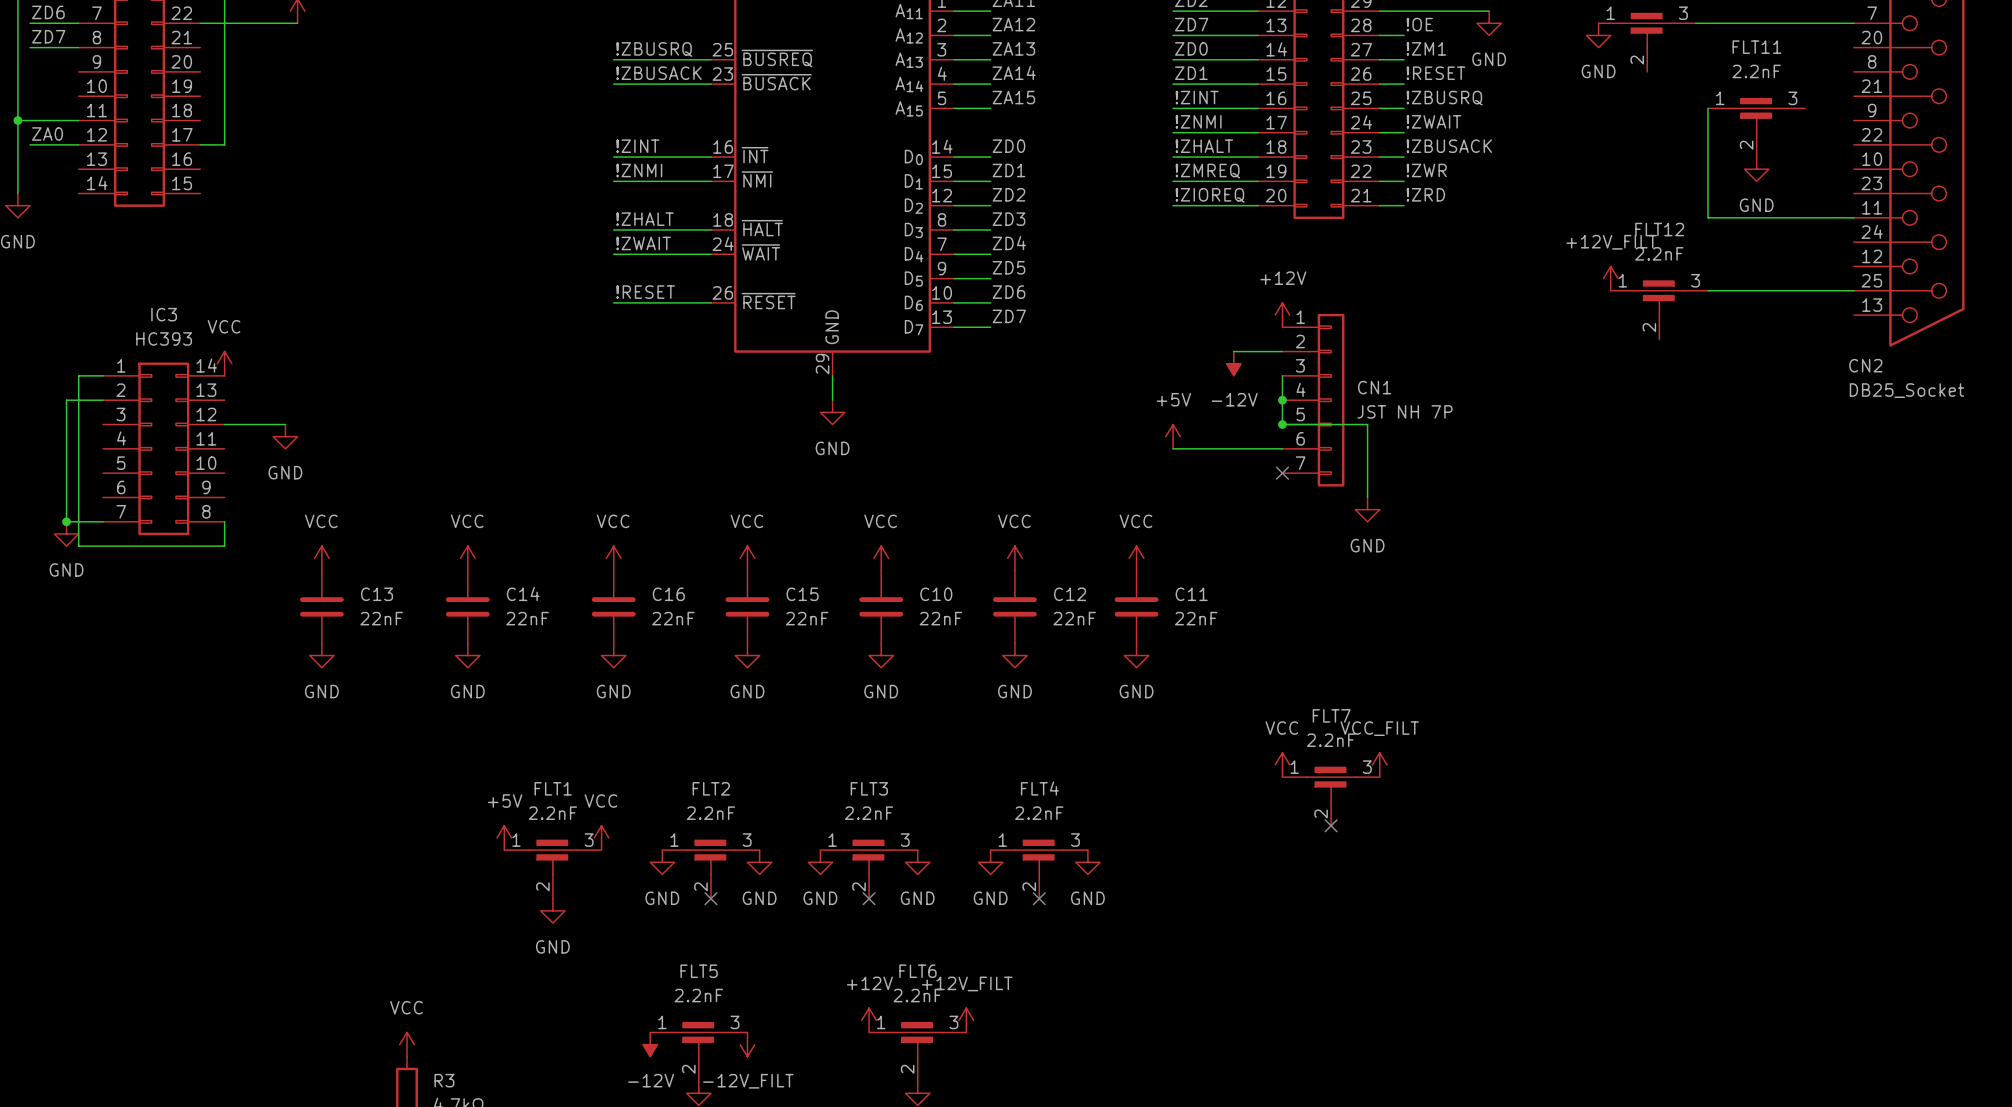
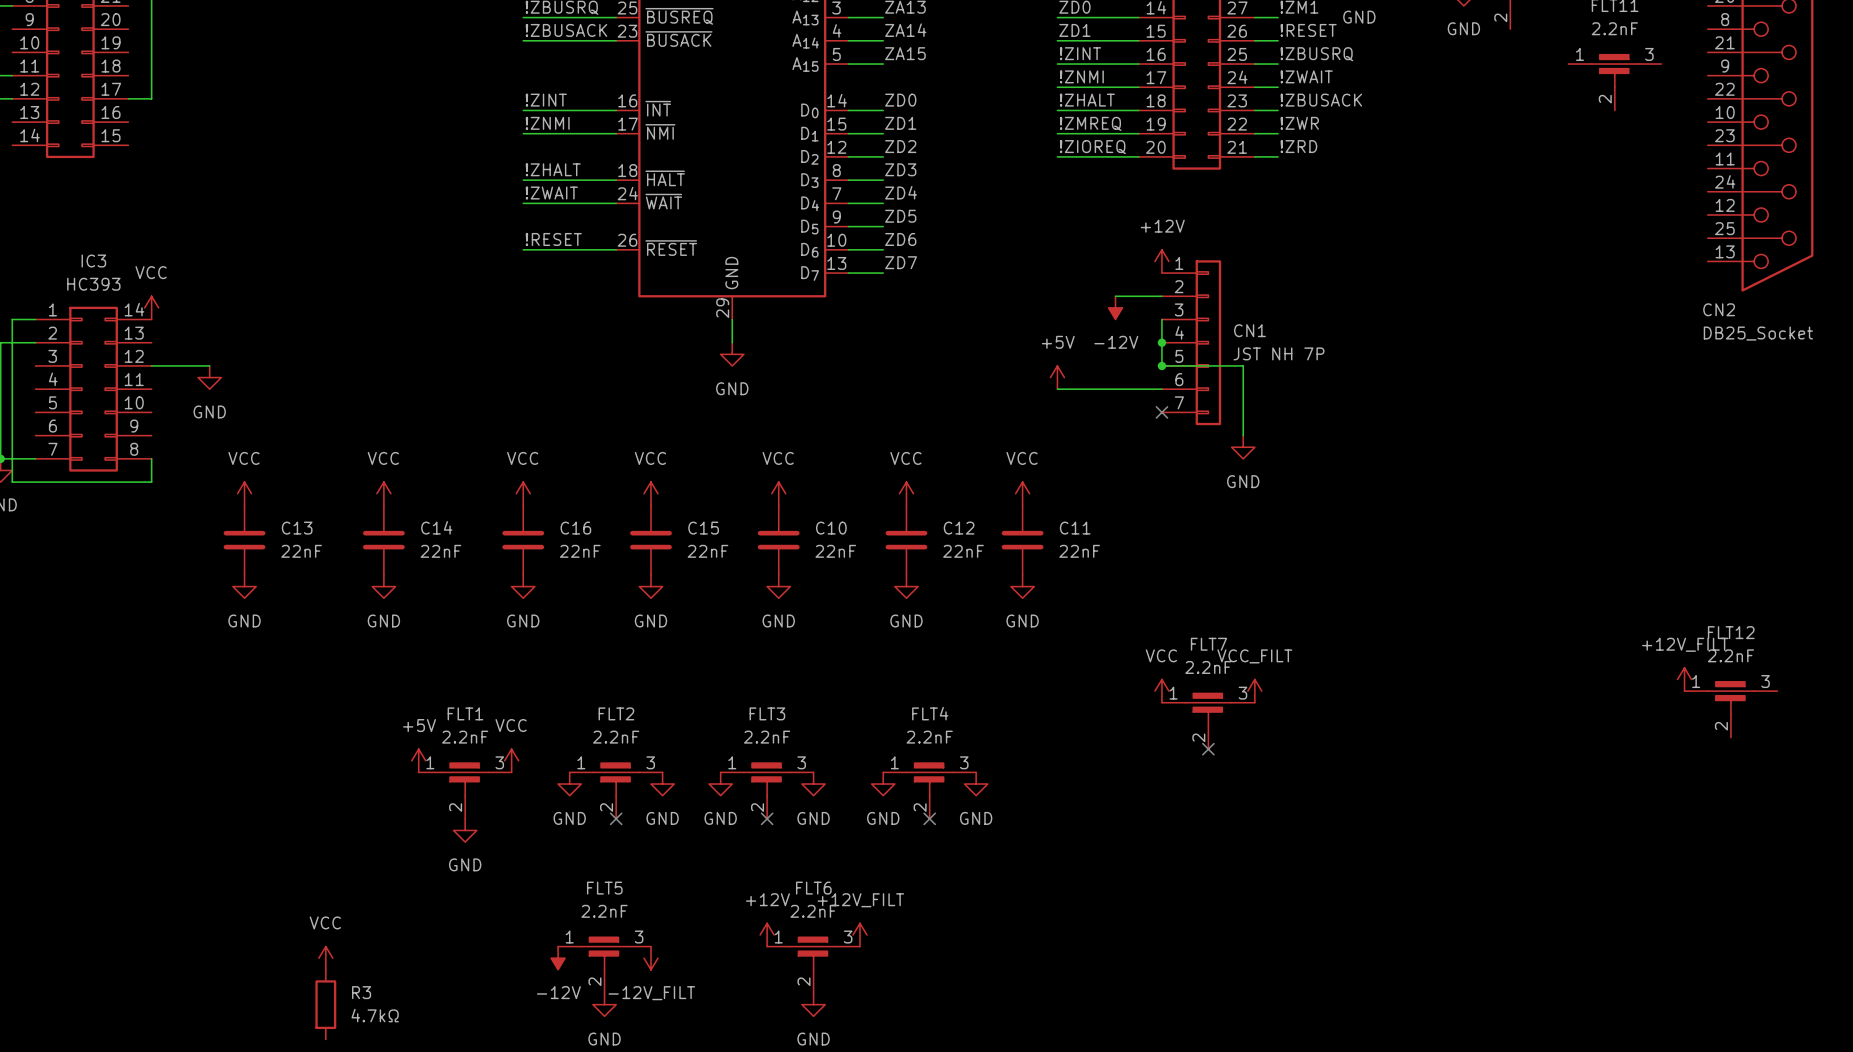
wire: (1708, 108) (1708, 217) (1853, 217) -> none
power symbol: GND (1756, 169) -> none
power symbol: +12V_FILT (1610, 278) -> none
wire: (1708, 290) (1853, 290) -> none
FLT12 position: (1659, 310) -> (1730, 709)
power symbol: none -> +12V_FILT (1684, 679)

